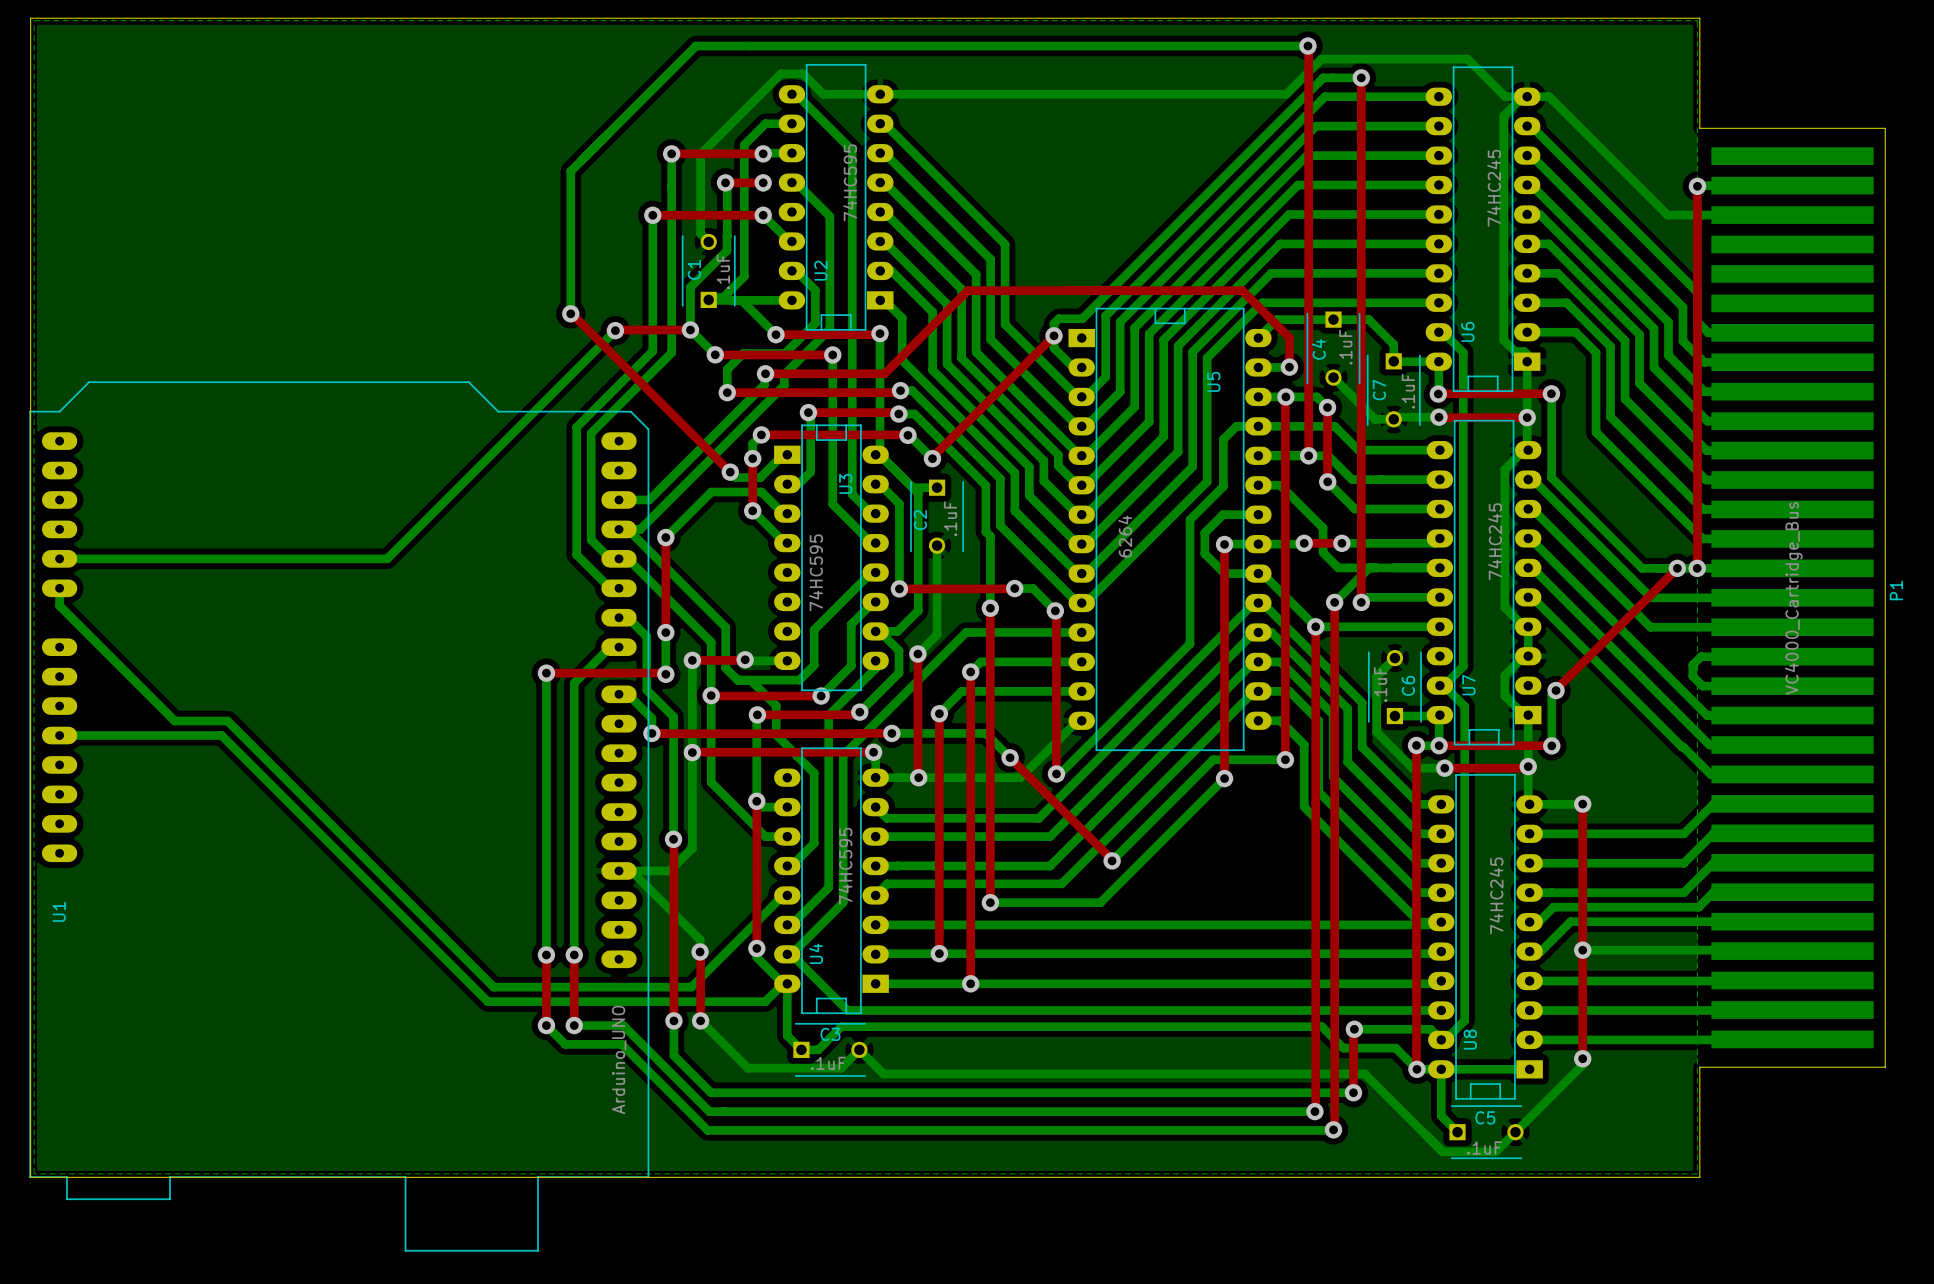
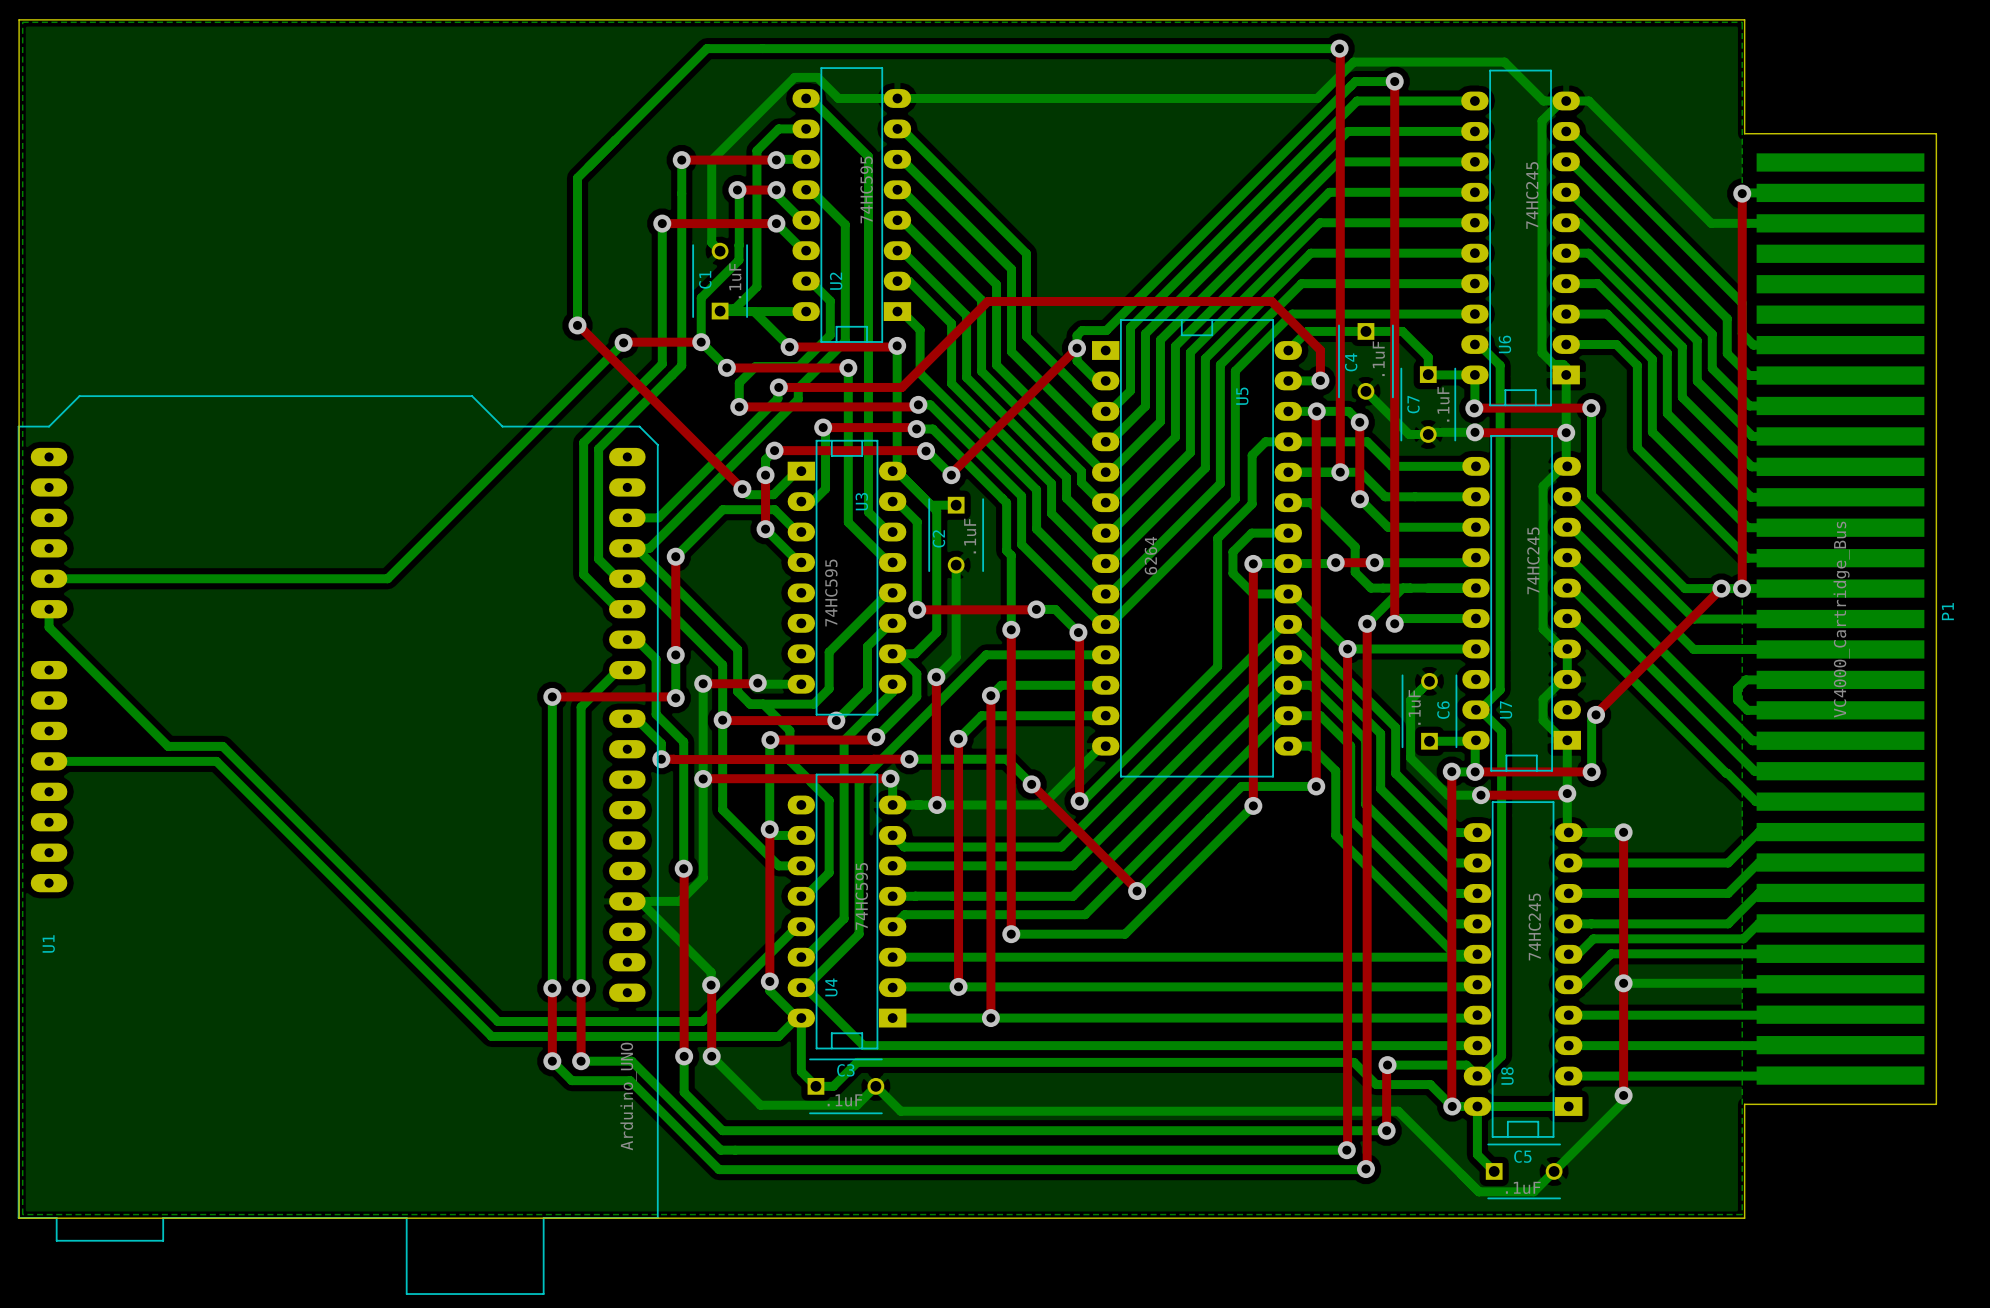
bottom track: none -> (776, 194) (801, 220) (806, 220)

